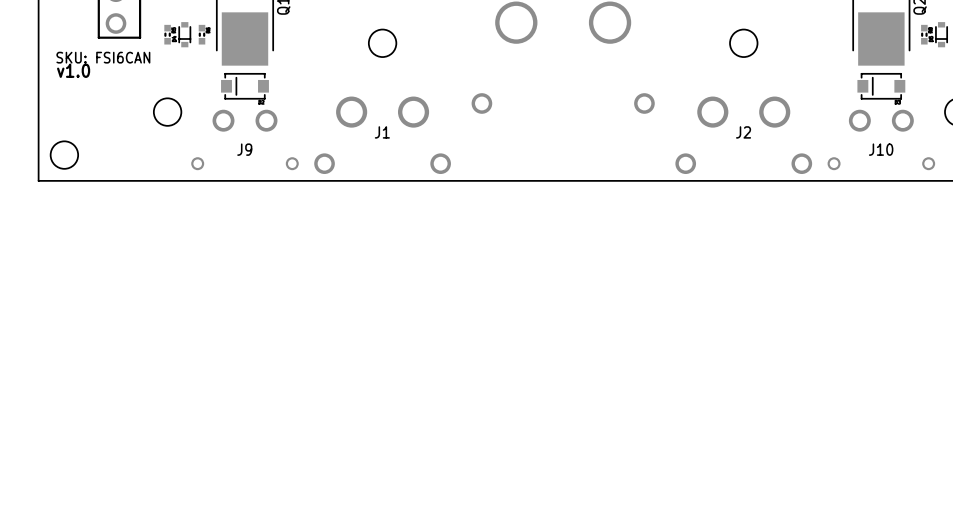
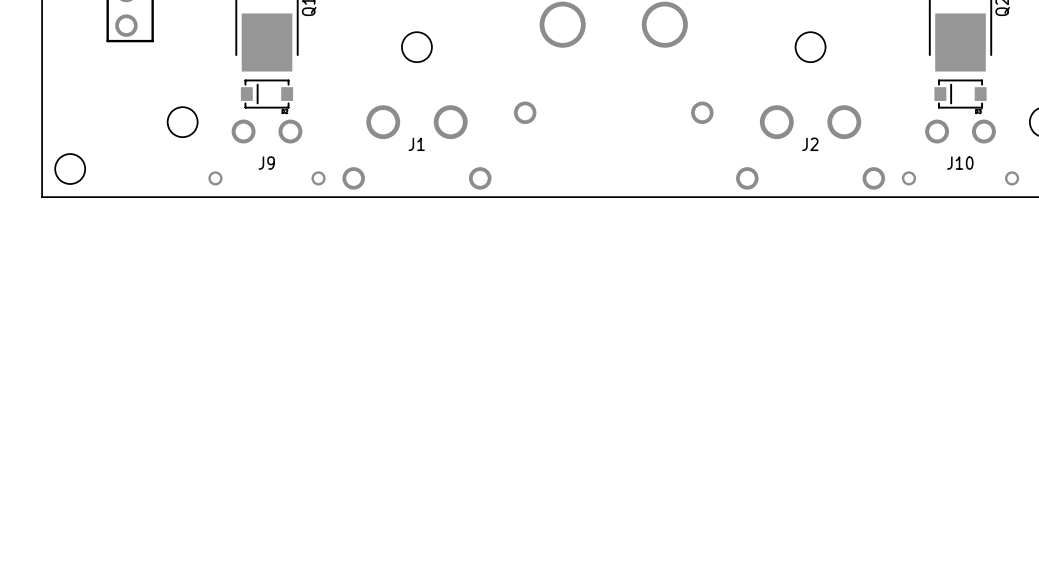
part: (167, 34) -> none
part: (184, 34) -> none
part: (201, 34) -> none
part: (924, 34) -> none
part: (941, 34) -> none
text: SKU: FSI6CAN (103, 57) -> none
text: v1.0 (73, 70) -> none

